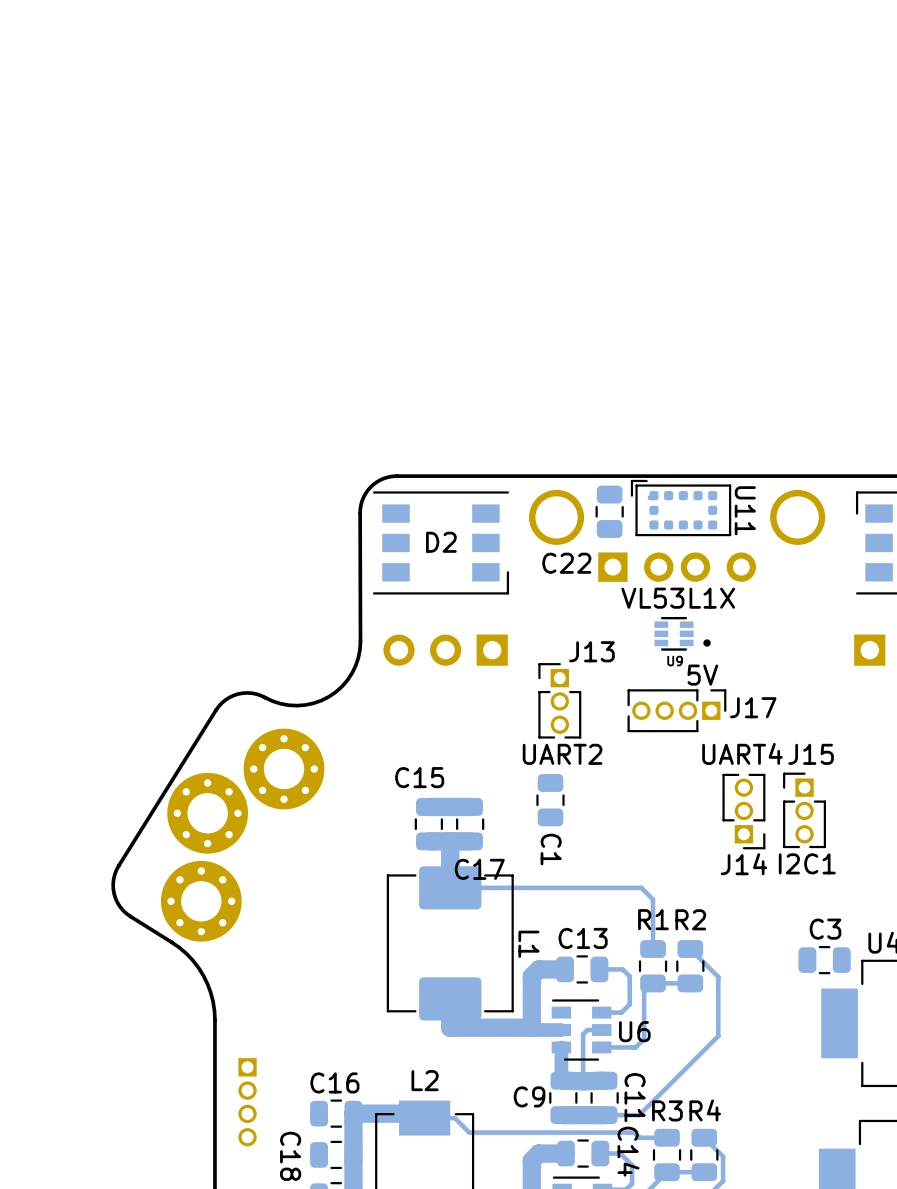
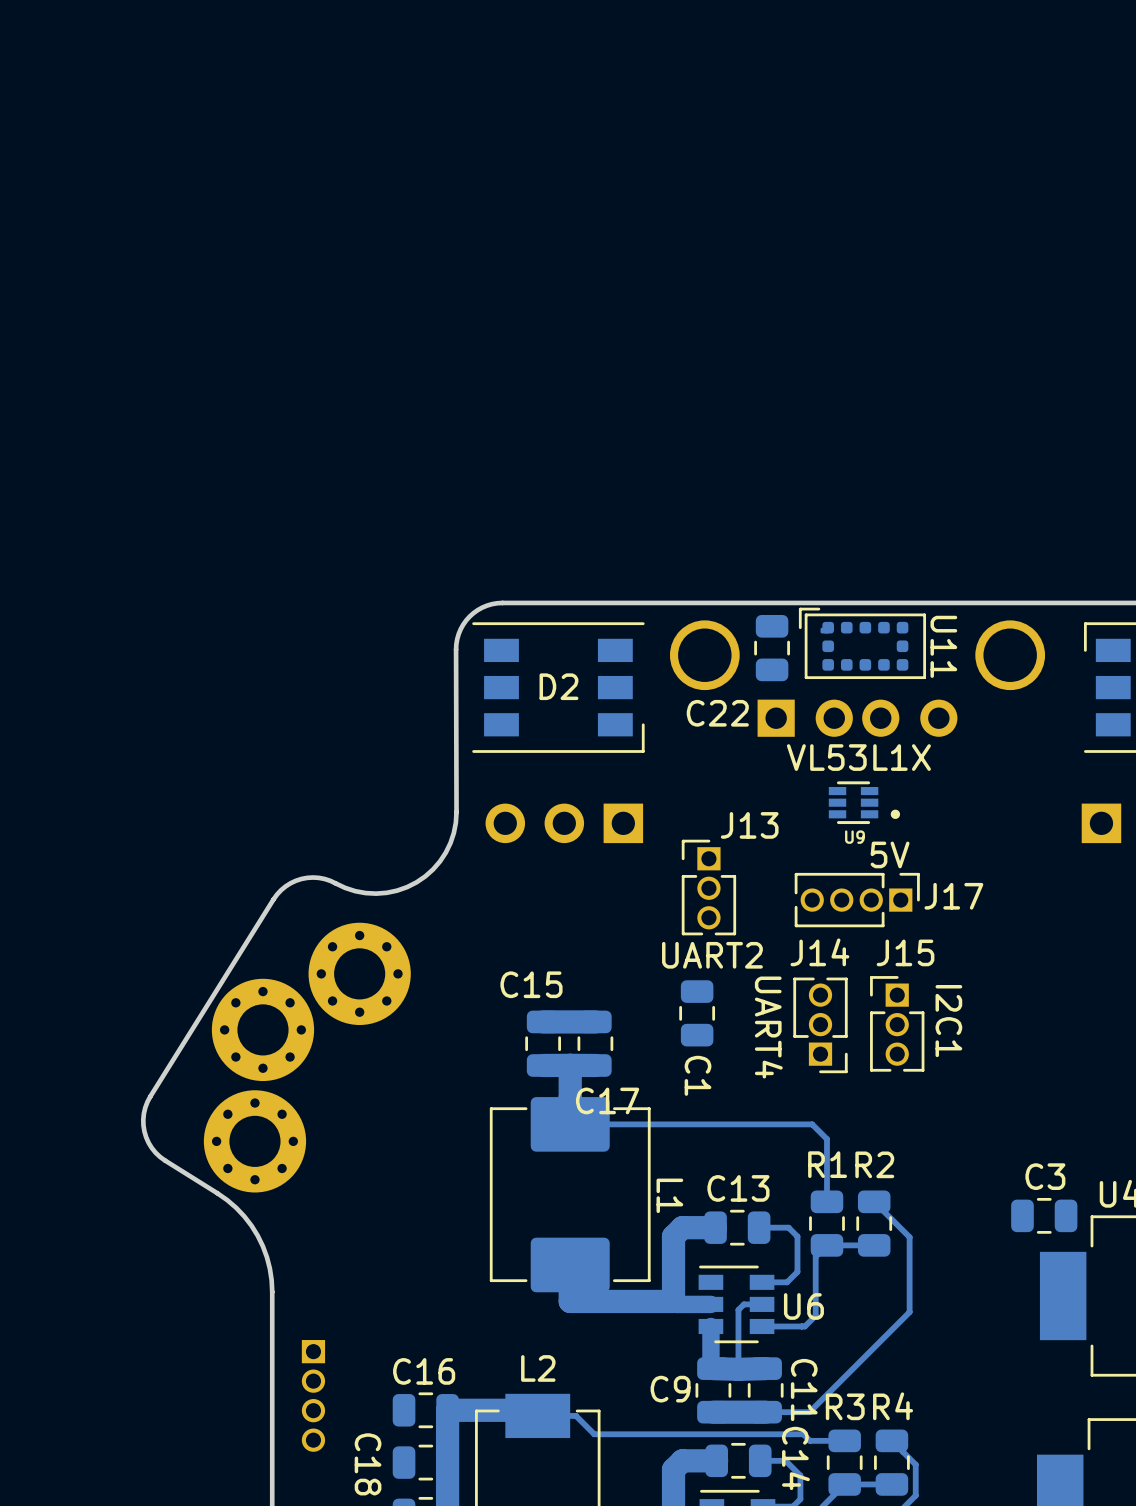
J14 value rotation: 0° (742, 753) -> 90° clockwise (768, 1027)
J15 position: (804, 810) -> (897, 1023)
J14 position: (743, 811) -> (820, 1025)
J15 value rotation: 0° (807, 863) -> 90° clockwise (948, 1021)
J14 name position: J14 (743, 864) -> J14 (819, 952)

